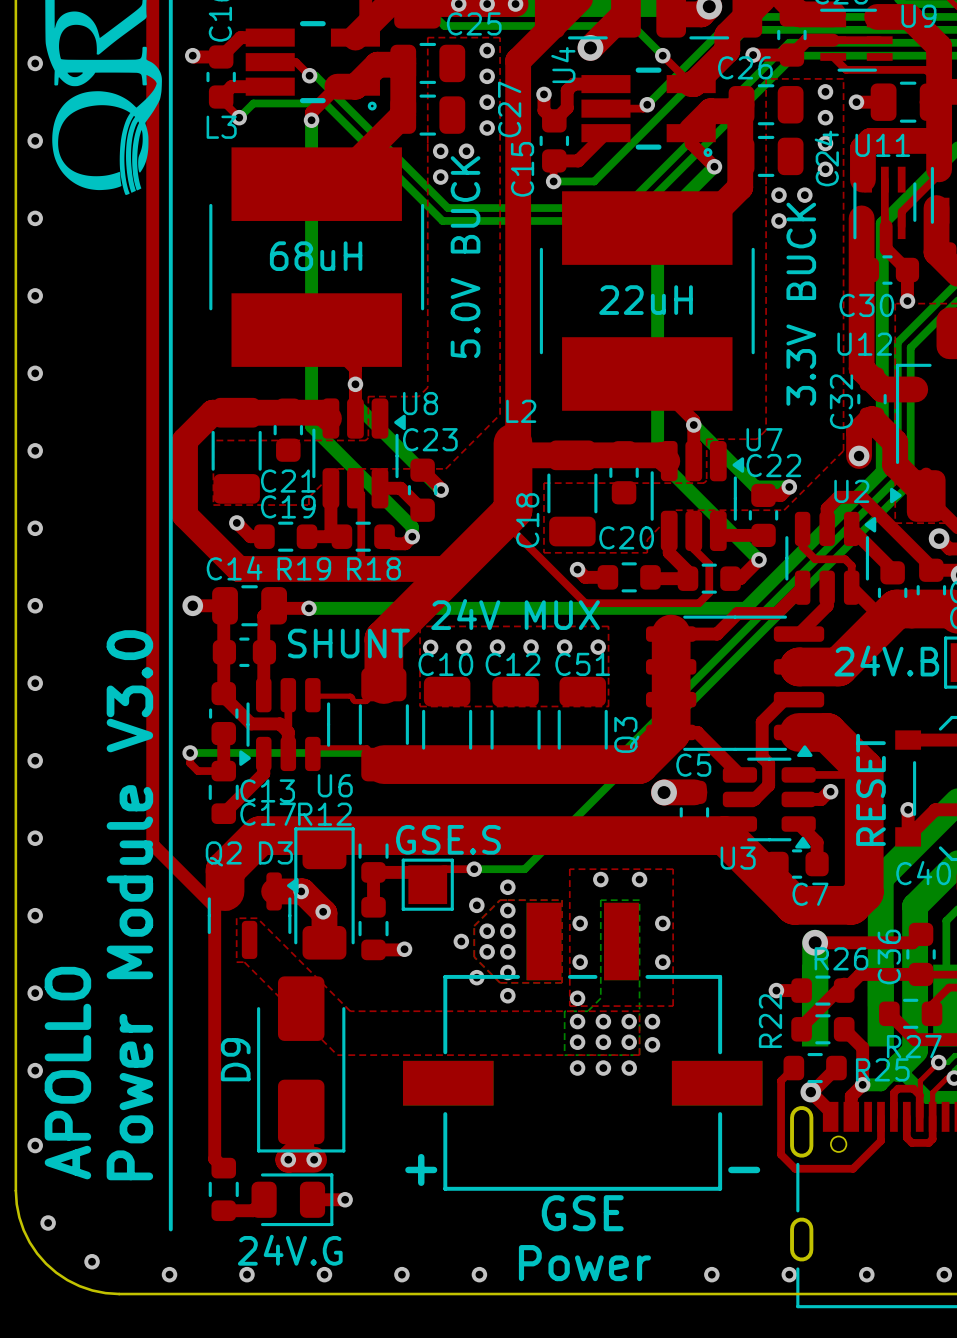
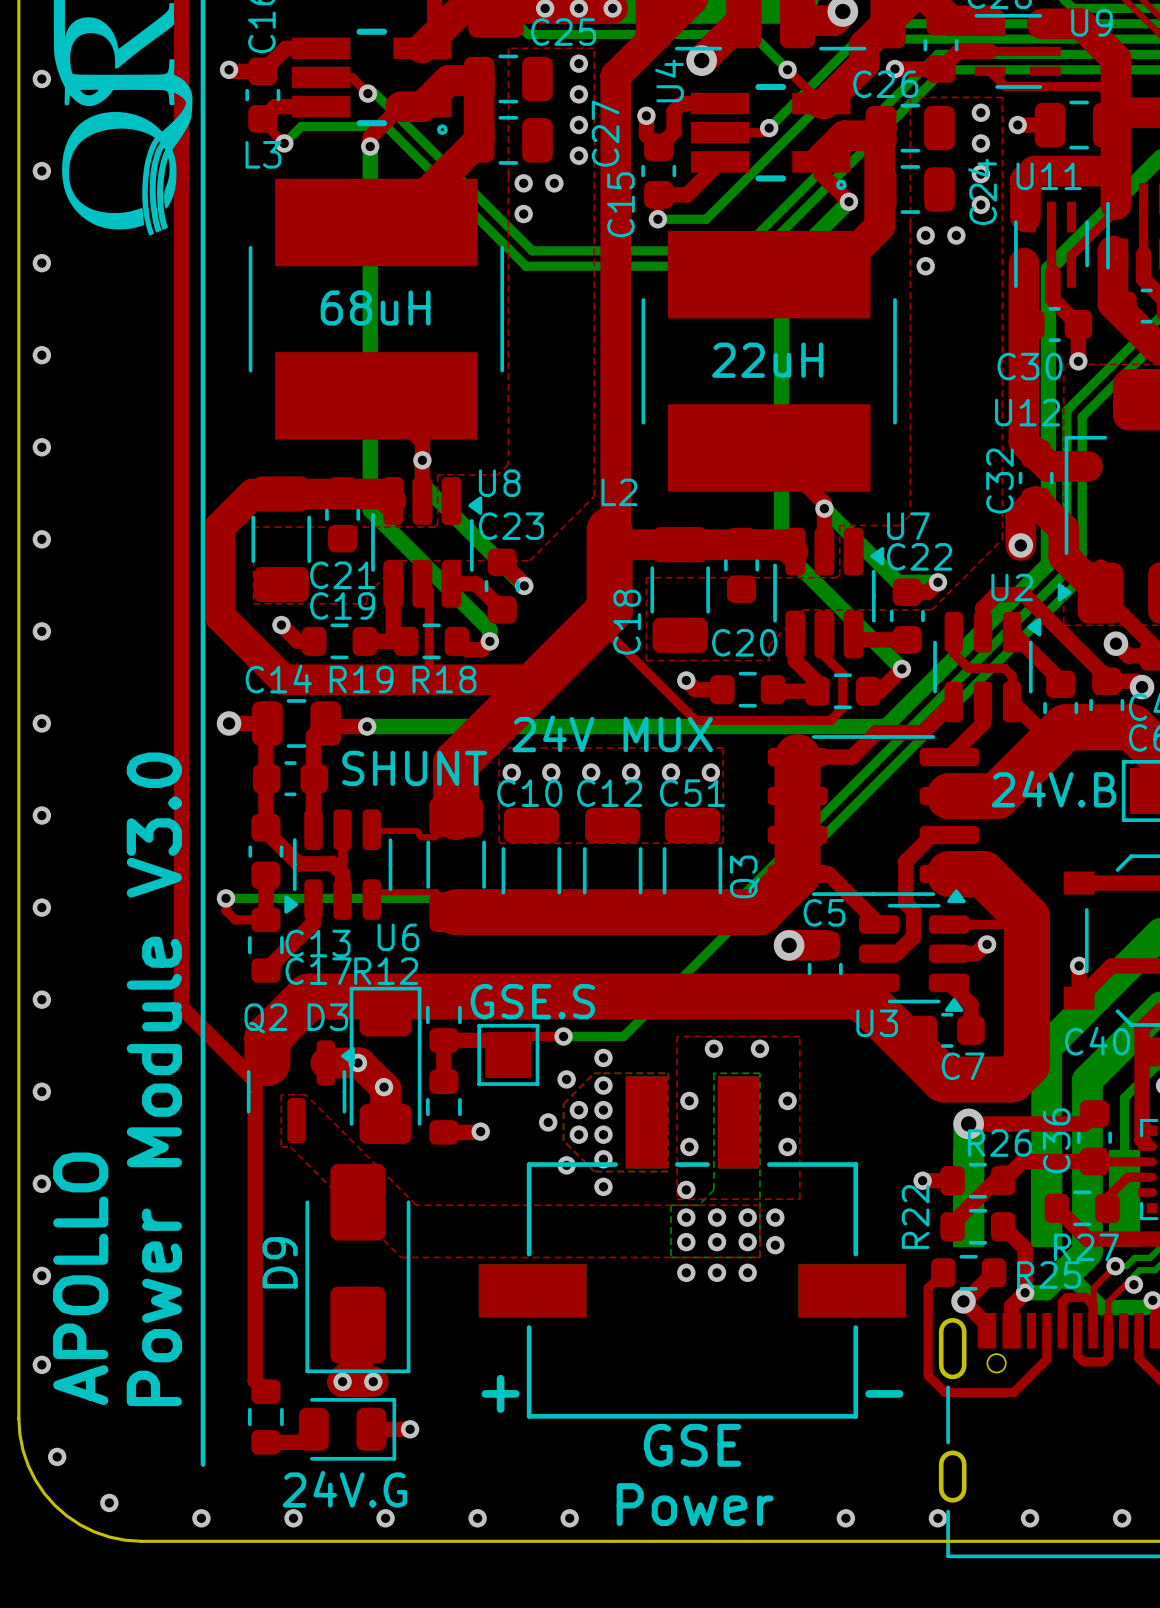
U8 text: 5.0V BUCK (465, 257) -> none
U7 text: 3.3V BUCK (801, 304) -> none
part text: RESET (871, 789) -> none

